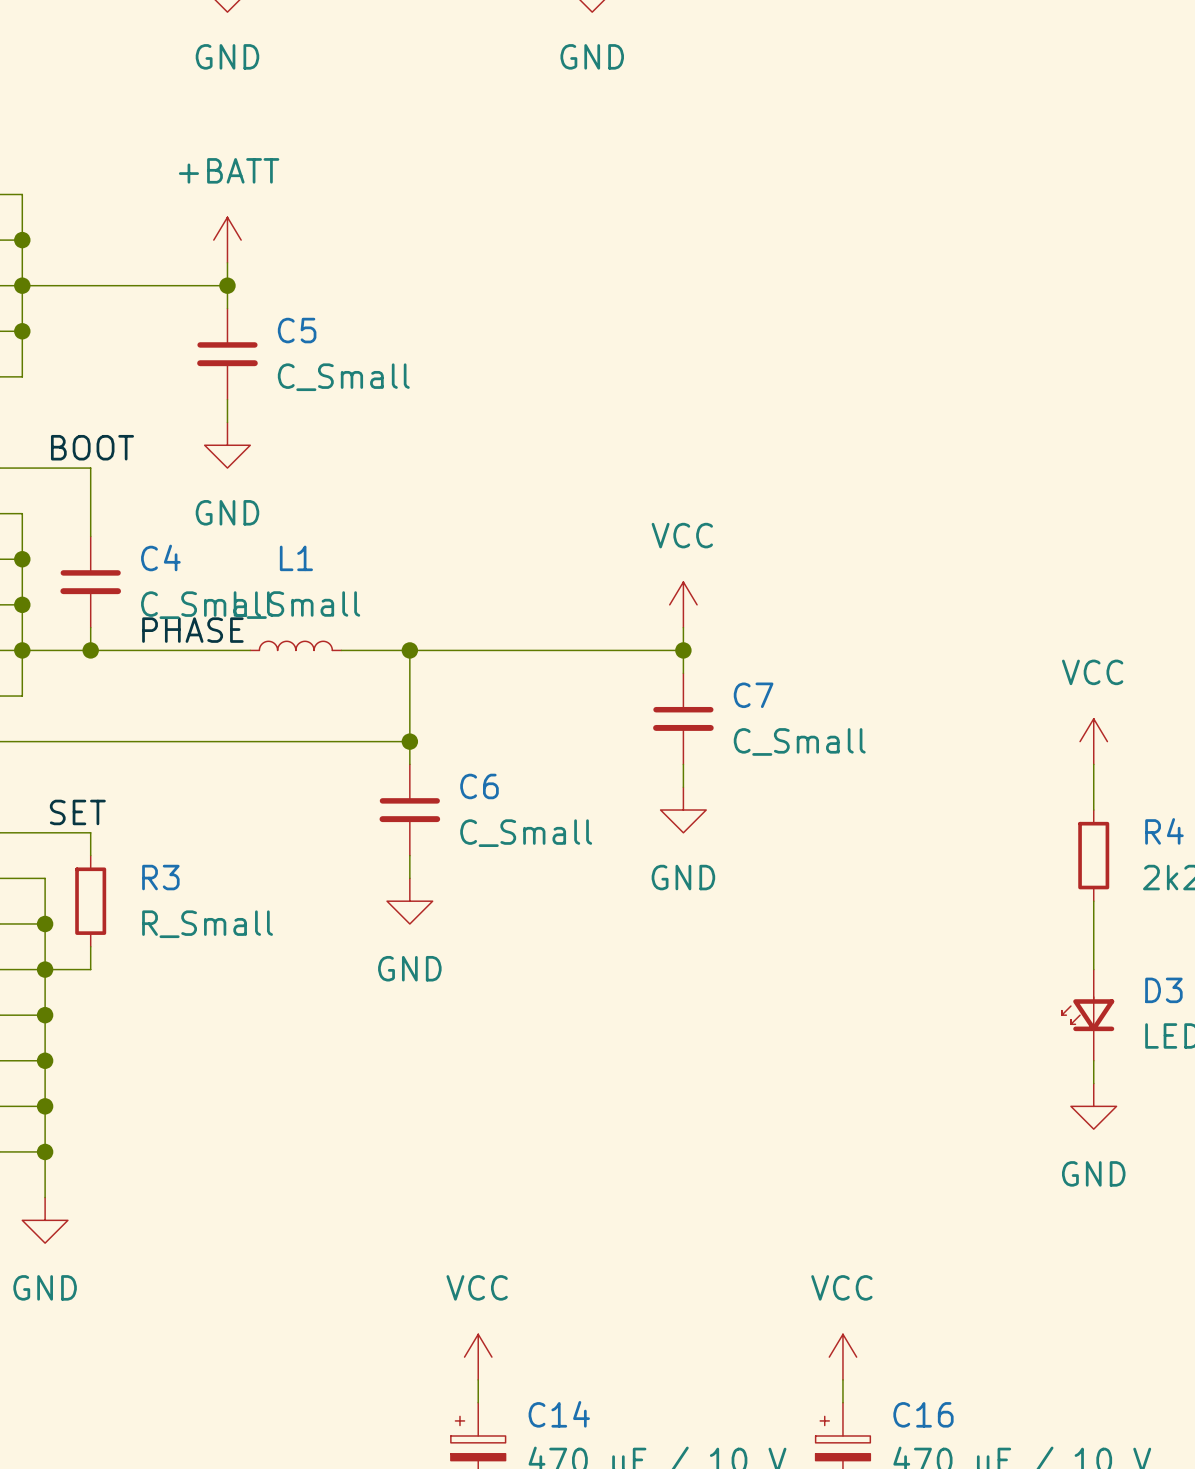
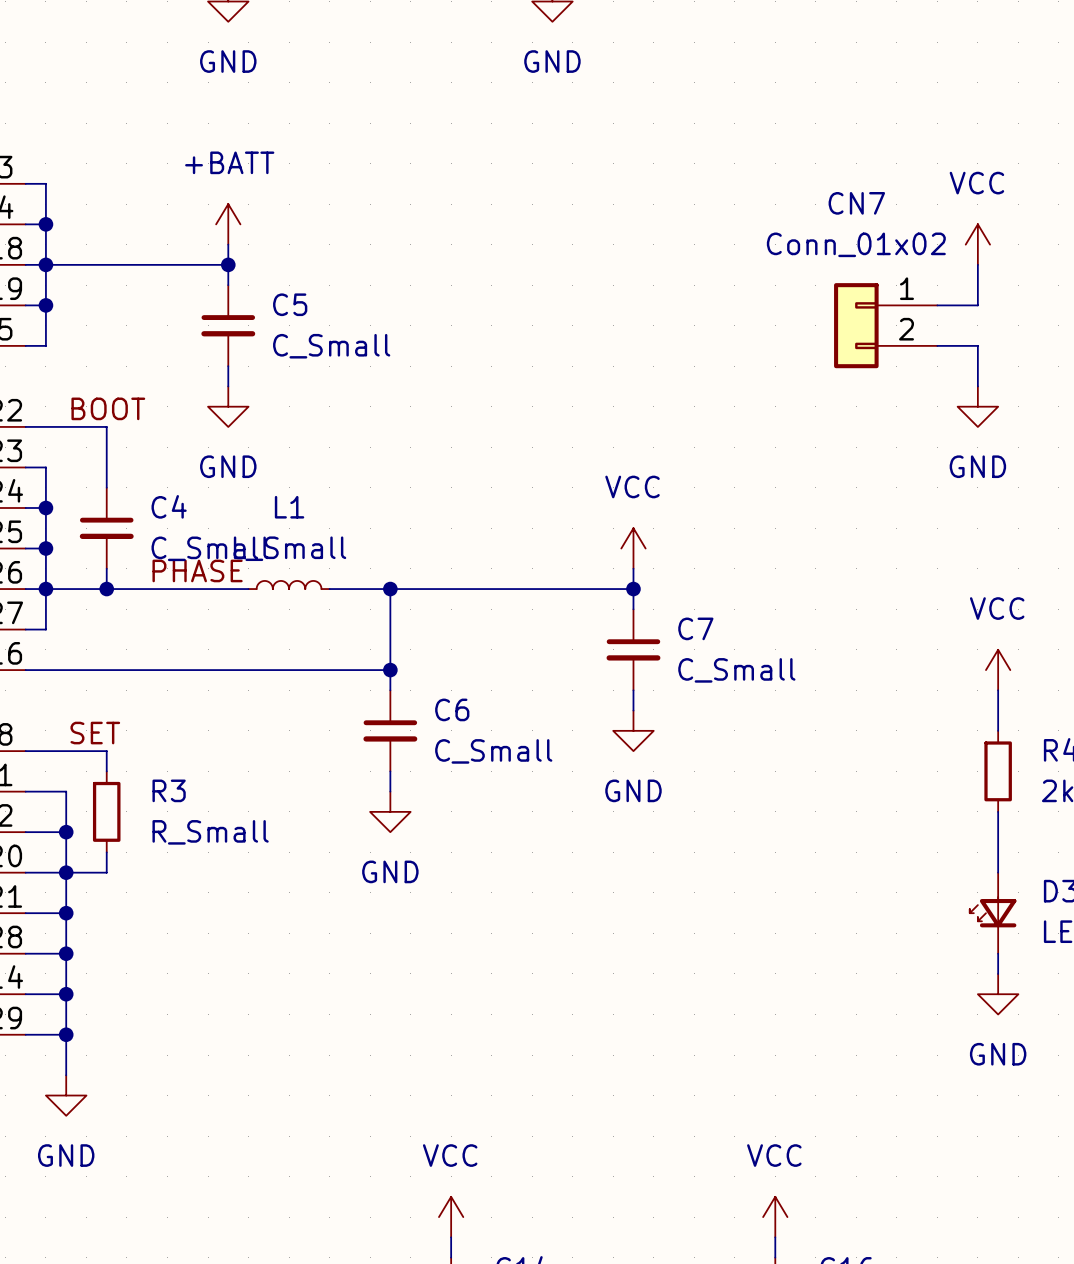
power symbol: none -> VCC (977, 244)
wire: none -> (977, 264) (977, 305) (937, 305)
CN7: none -> Conn_01x02 (885, 325)
wire: none -> (937, 345) (977, 345) (977, 386)
power symbol: none -> GND (977, 406)

